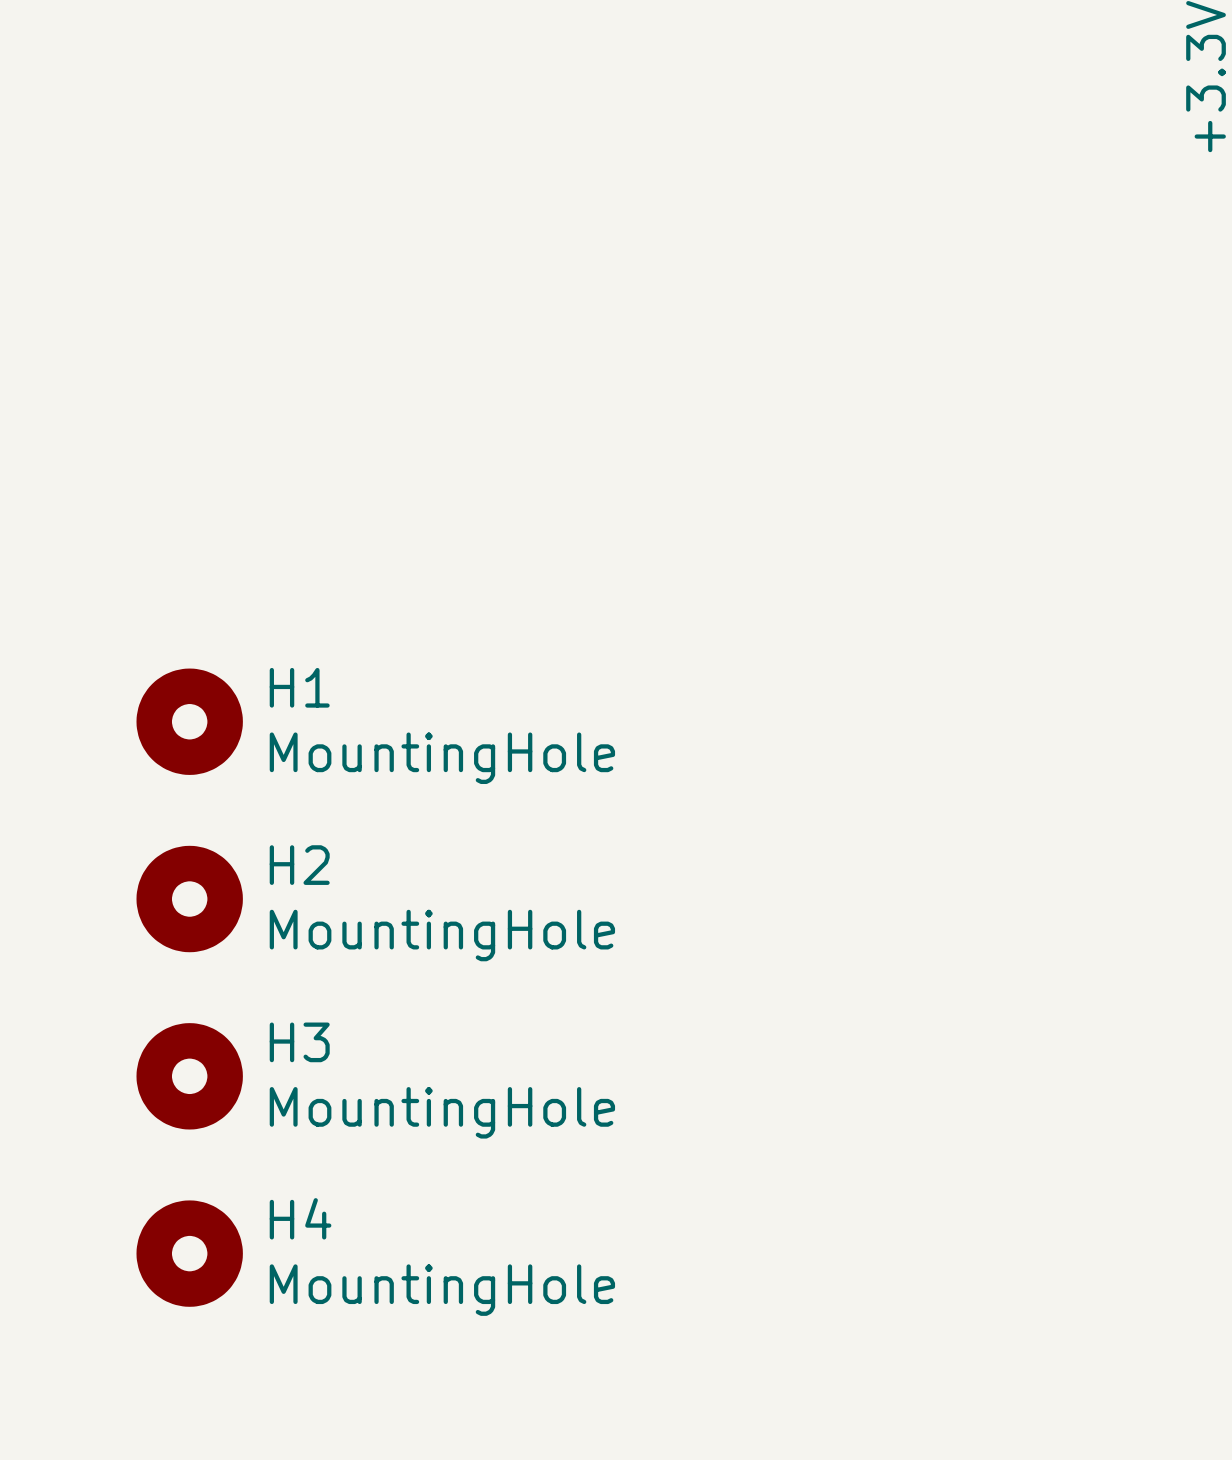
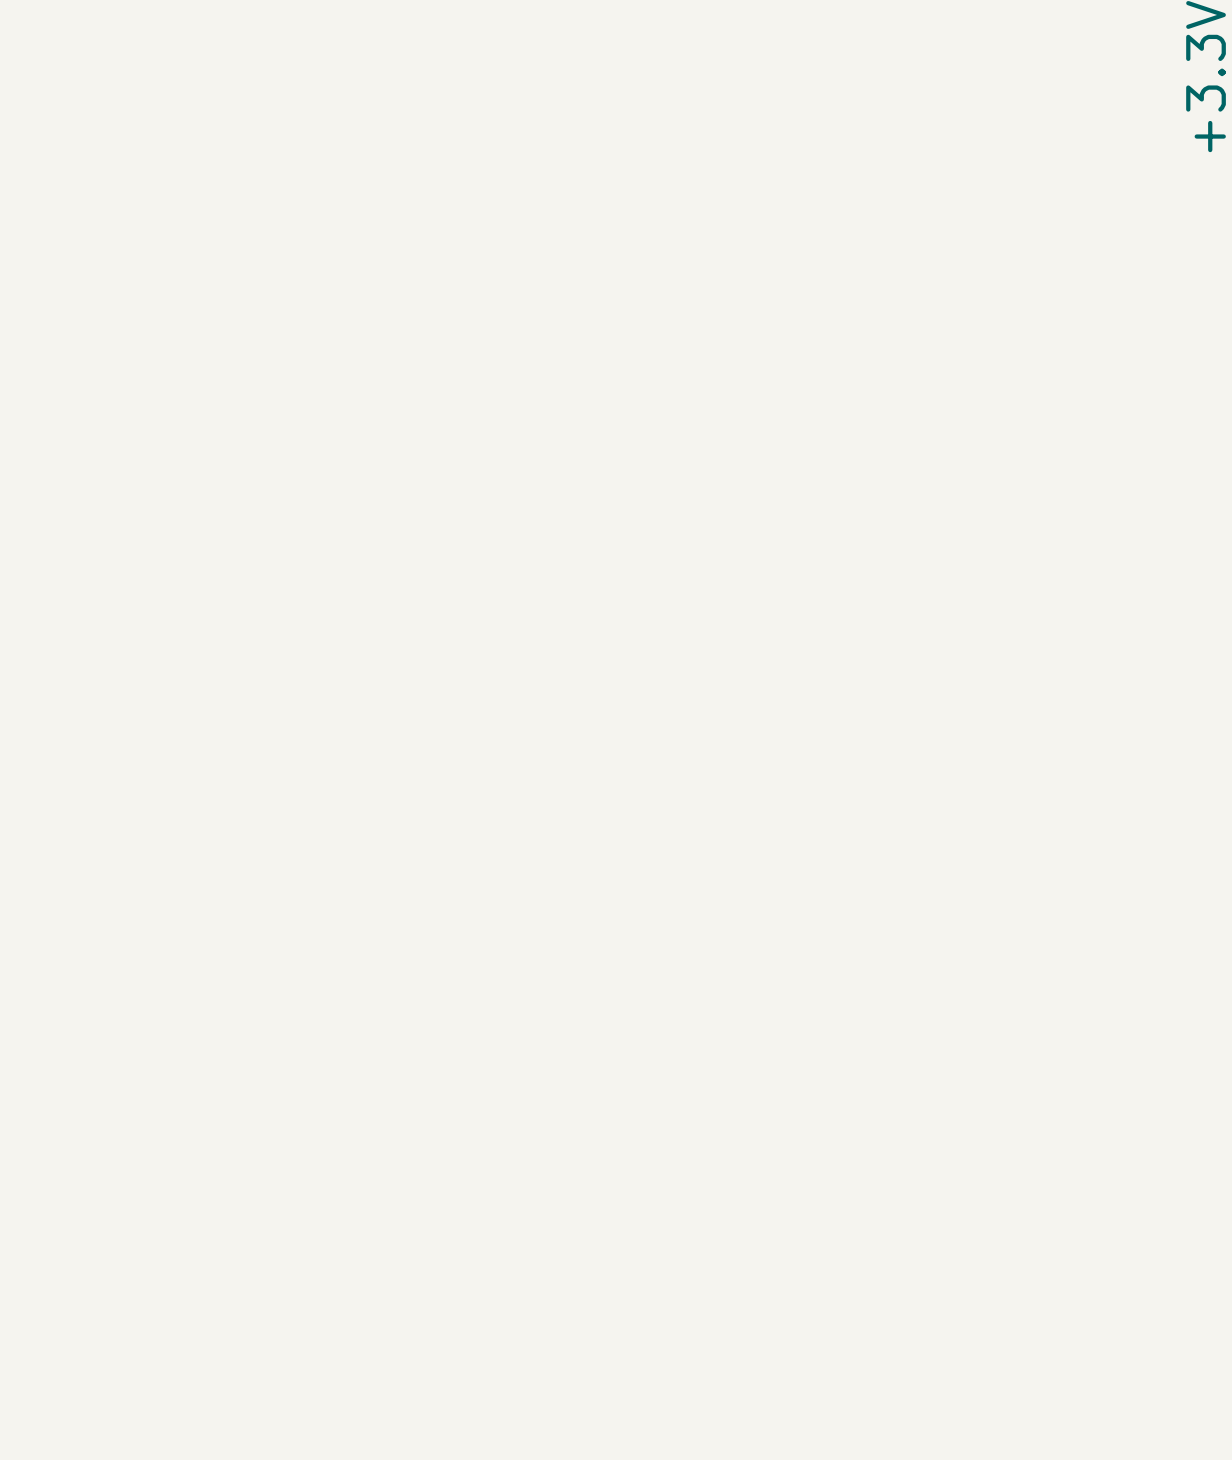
H1: MountingHole (189, 721) -> none
H2: MountingHole (189, 899) -> none
H3: MountingHole (189, 1076) -> none
H4: MountingHole (189, 1253) -> none

